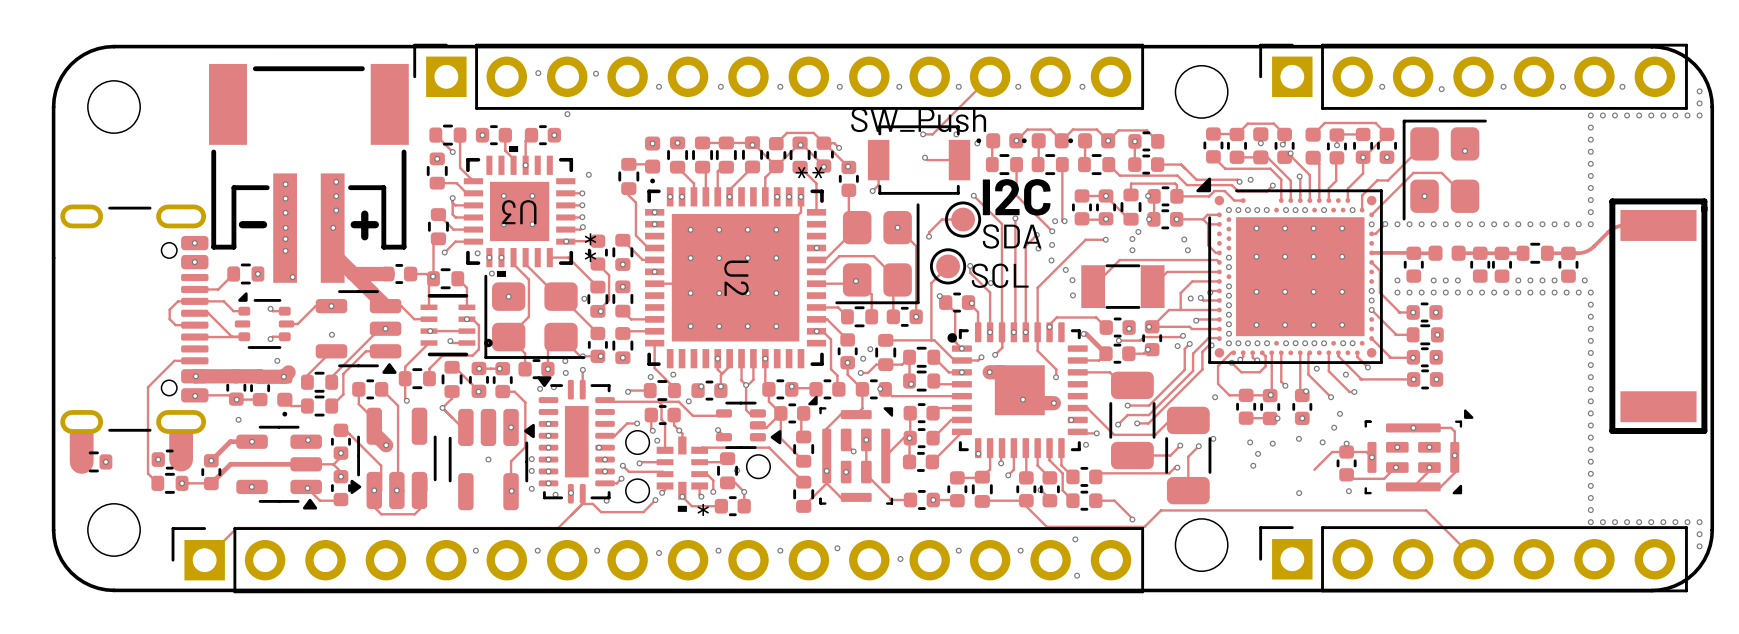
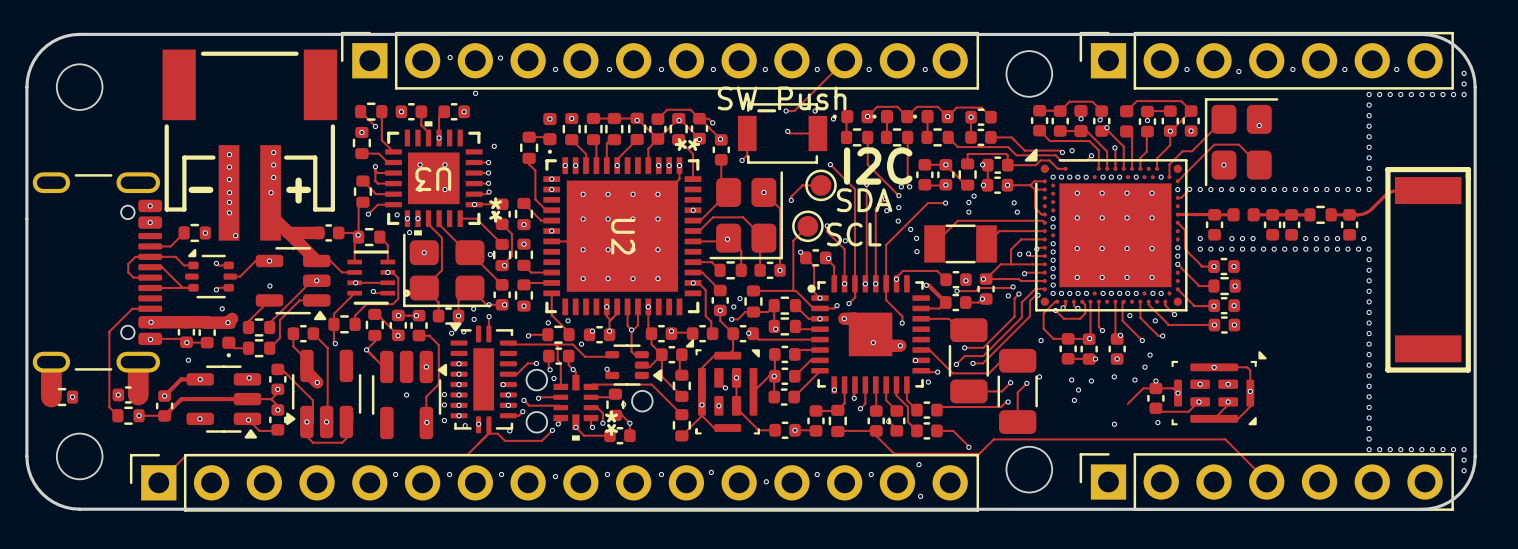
part footprint: [656, 436, 709, 512] -> [553, 374, 599, 441]

